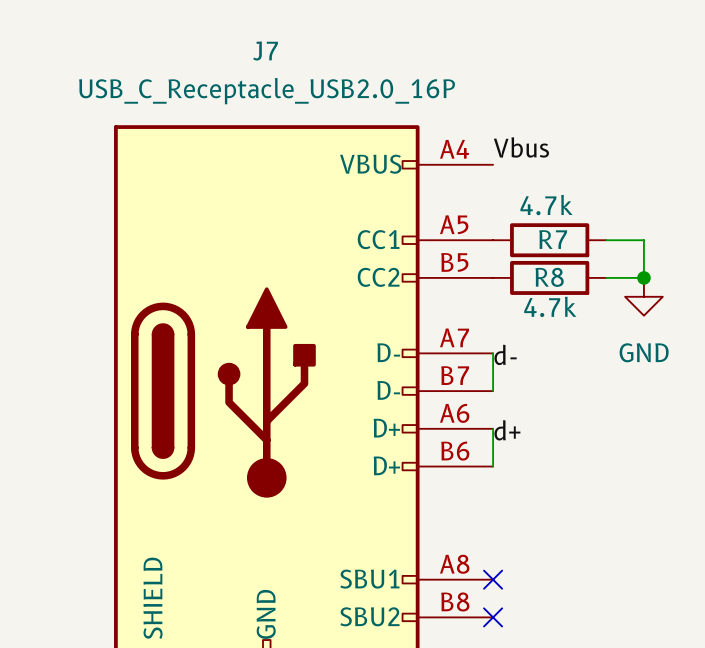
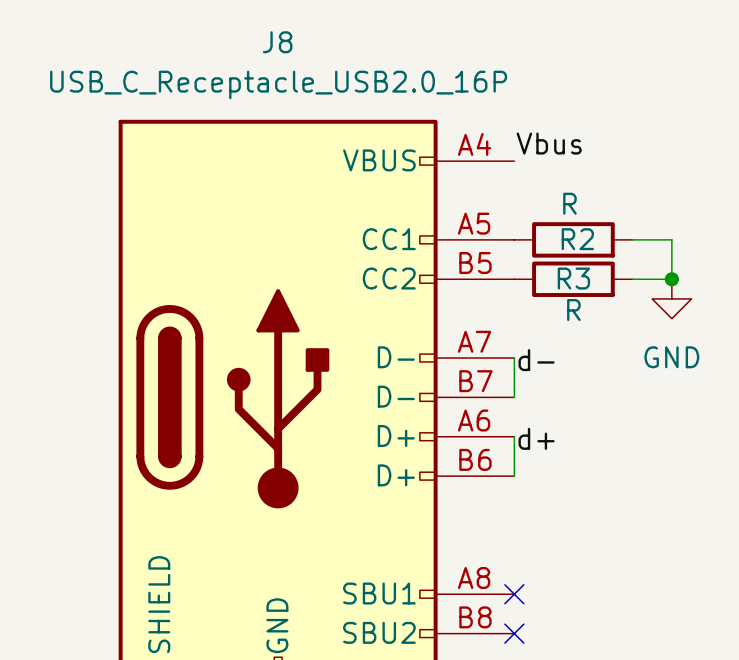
J7 name: J7 (265, 51) -> J8 (277, 42)
R7 value: 4.7k (546, 205) -> R (569, 203)
R7 name: R7 (553, 239) -> R2 (577, 239)
R8 name: R8 (549, 277) -> R3 (573, 278)
R8 value: 4.7k (550, 306) -> R (573, 310)

